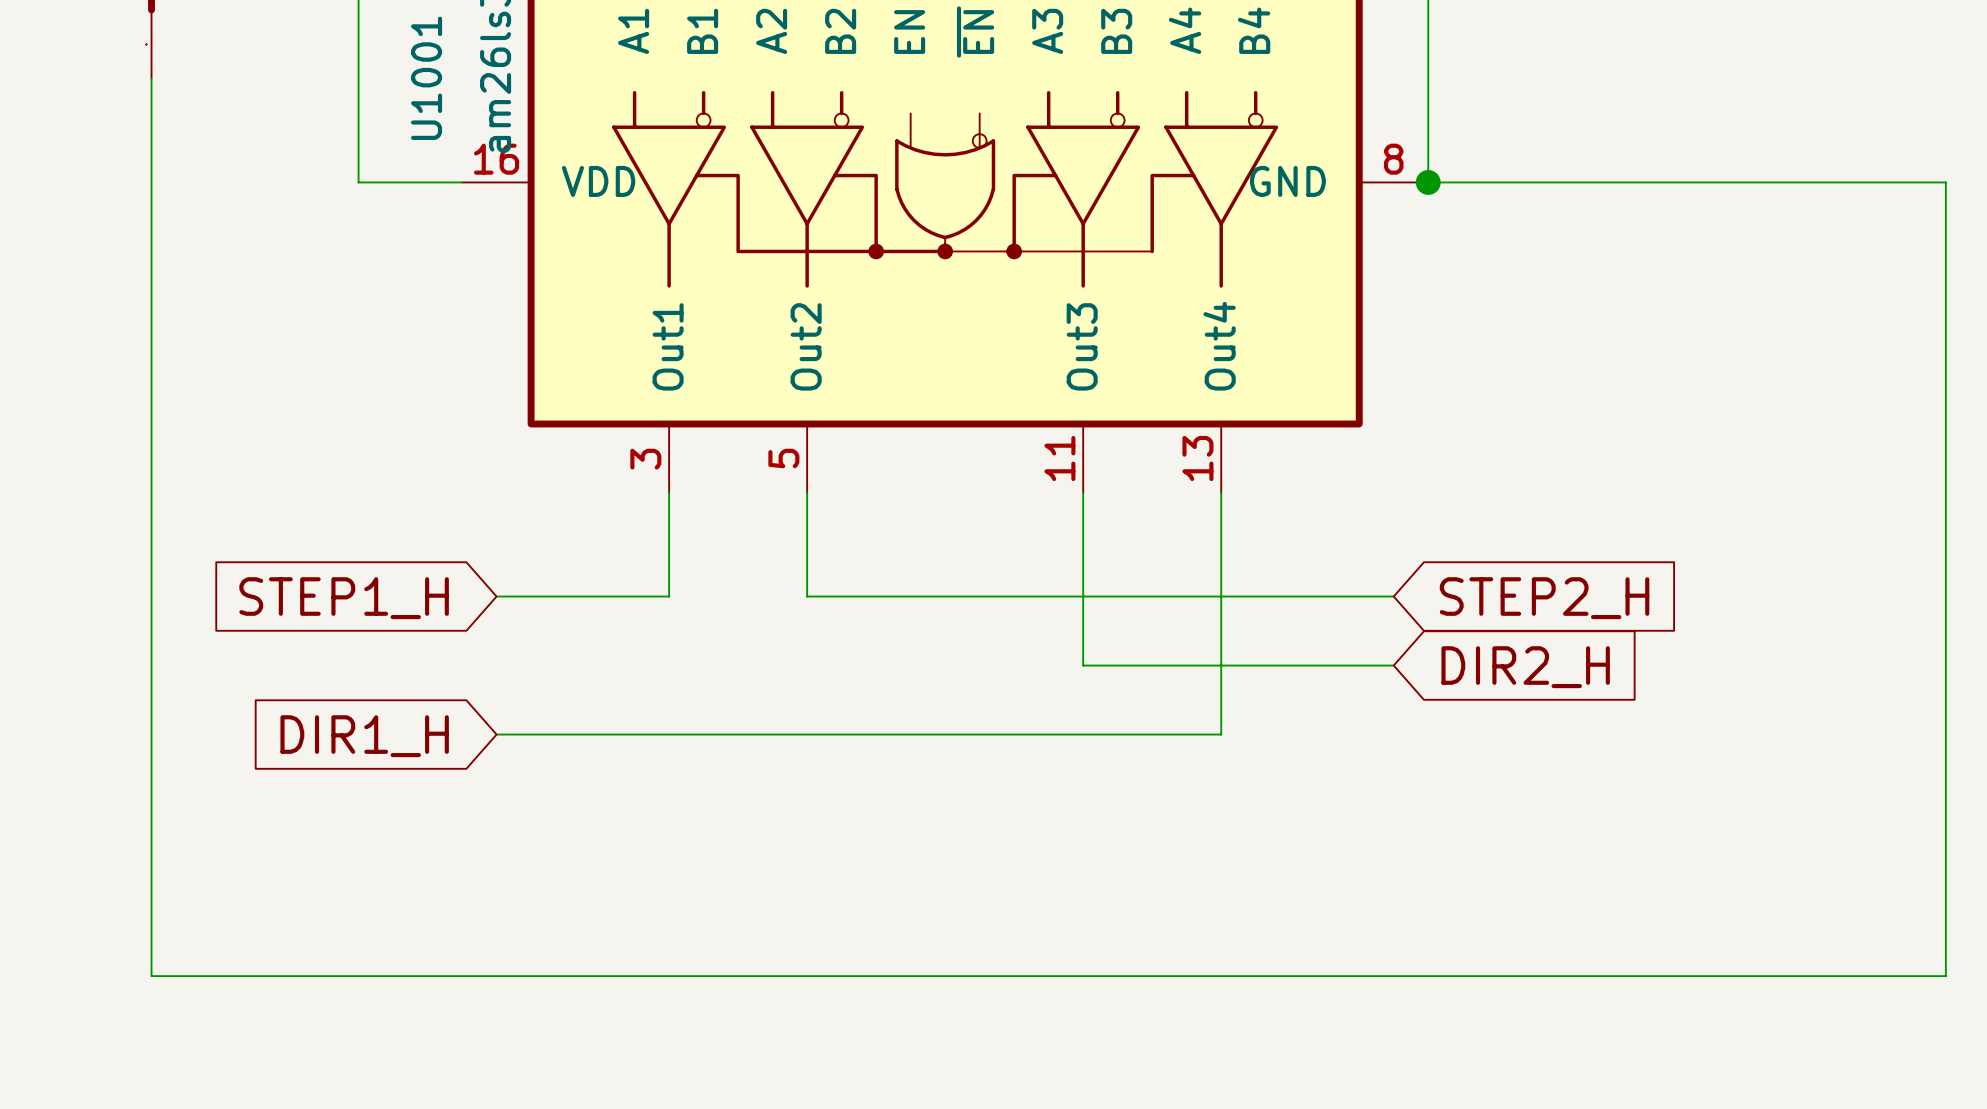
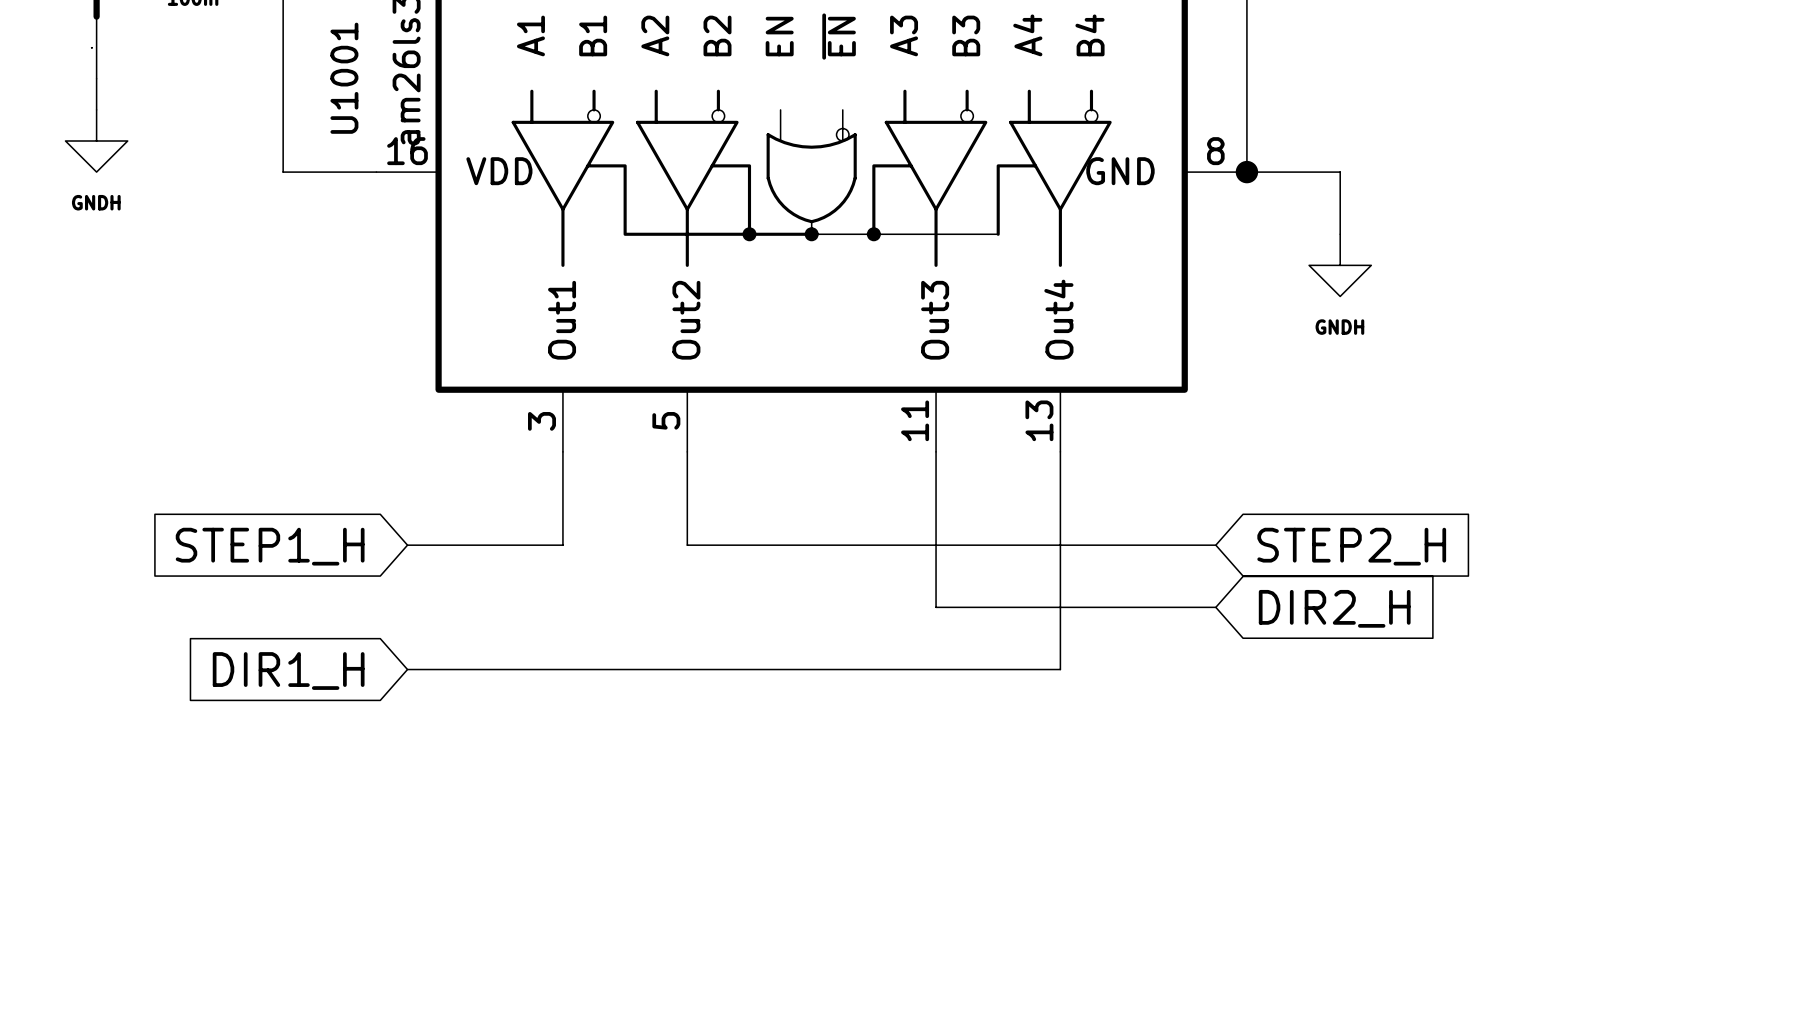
wire: (151, 113) (151, 976) (1945, 976) (1945, 182) (1531, 182) -> (1340, 234) (1340, 172)
power symbol: none -> GNDH (96, 141)
power symbol: none -> GNDH (1340, 265)

